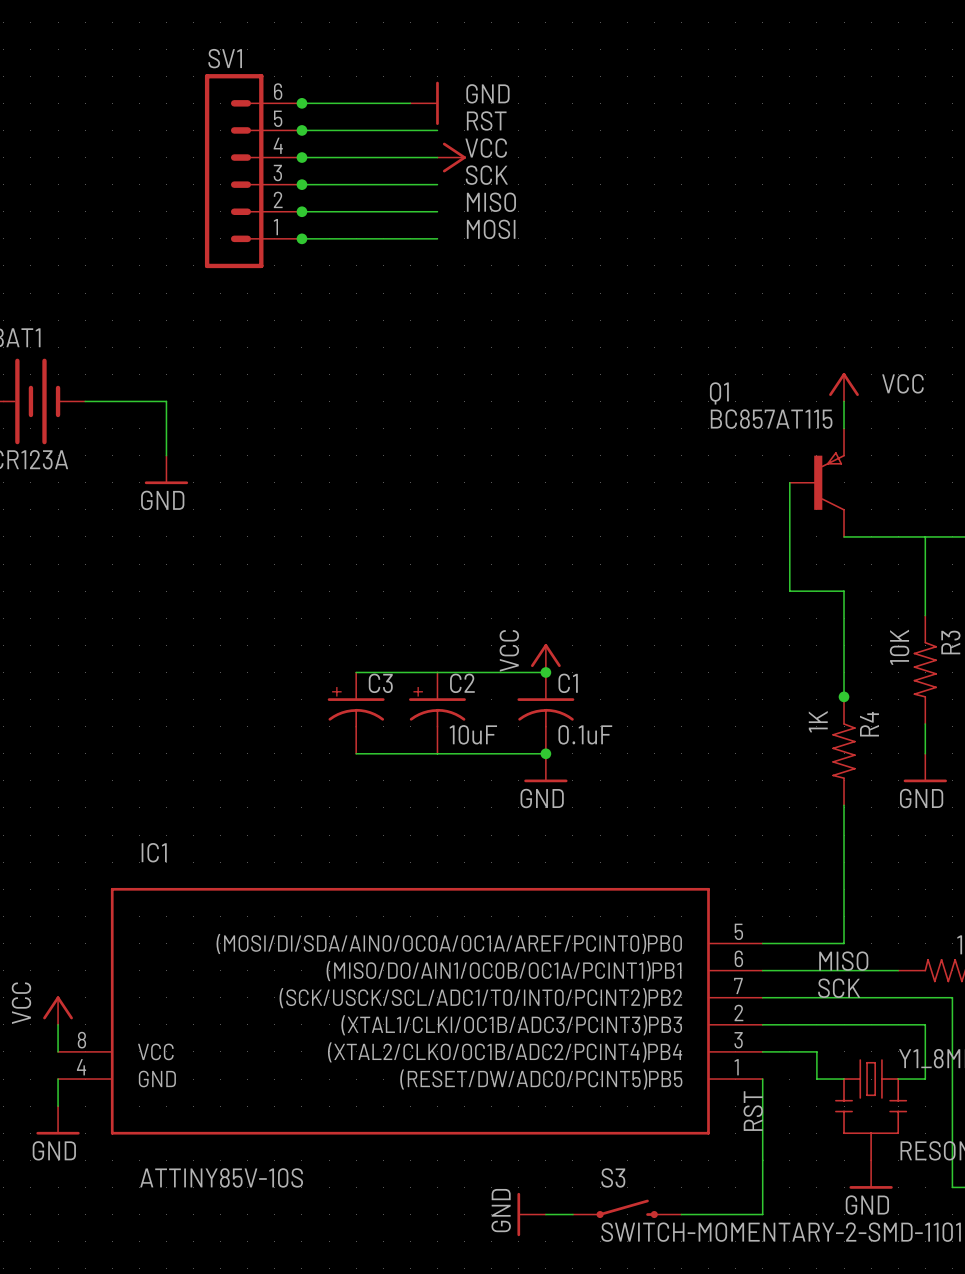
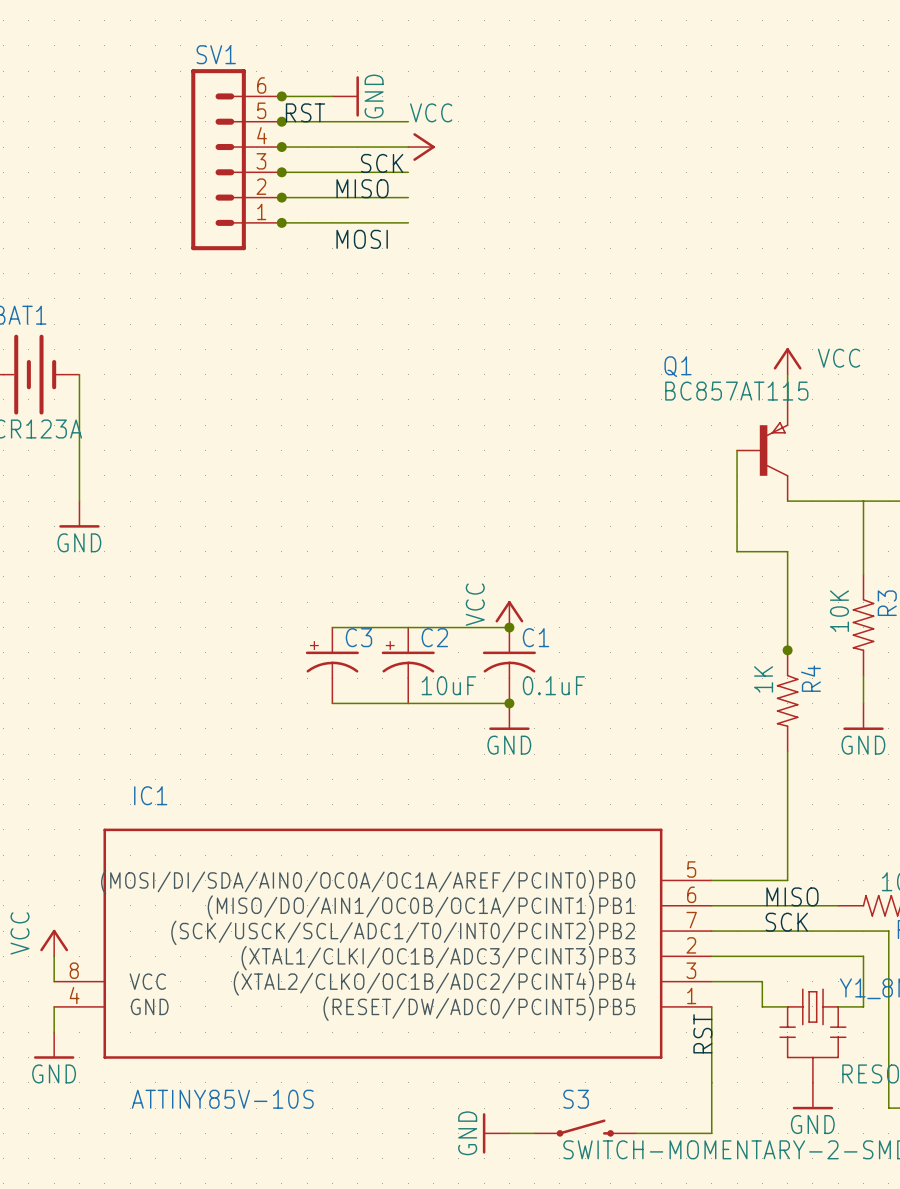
power symbol text rotation: 0° (487, 93) -> 90° counterclockwise (374, 96)
power symbol position: GND (424, 103) -> GND (345, 96)
label position: RST (486, 120) -> RST (305, 112)
power symbol text position: VCC (486, 148) -> VCC (431, 112)
label position: SCK (486, 175) -> SCK (382, 163)
label position: MISO (491, 202) -> MISO (362, 188)
label position: MOSI (491, 229) -> MOSI (362, 239)
wire: (85, 401) (166, 401) (166, 455) -> (79, 374) (79, 501)
power symbol position: GND (166, 469) -> GND (79, 514)

